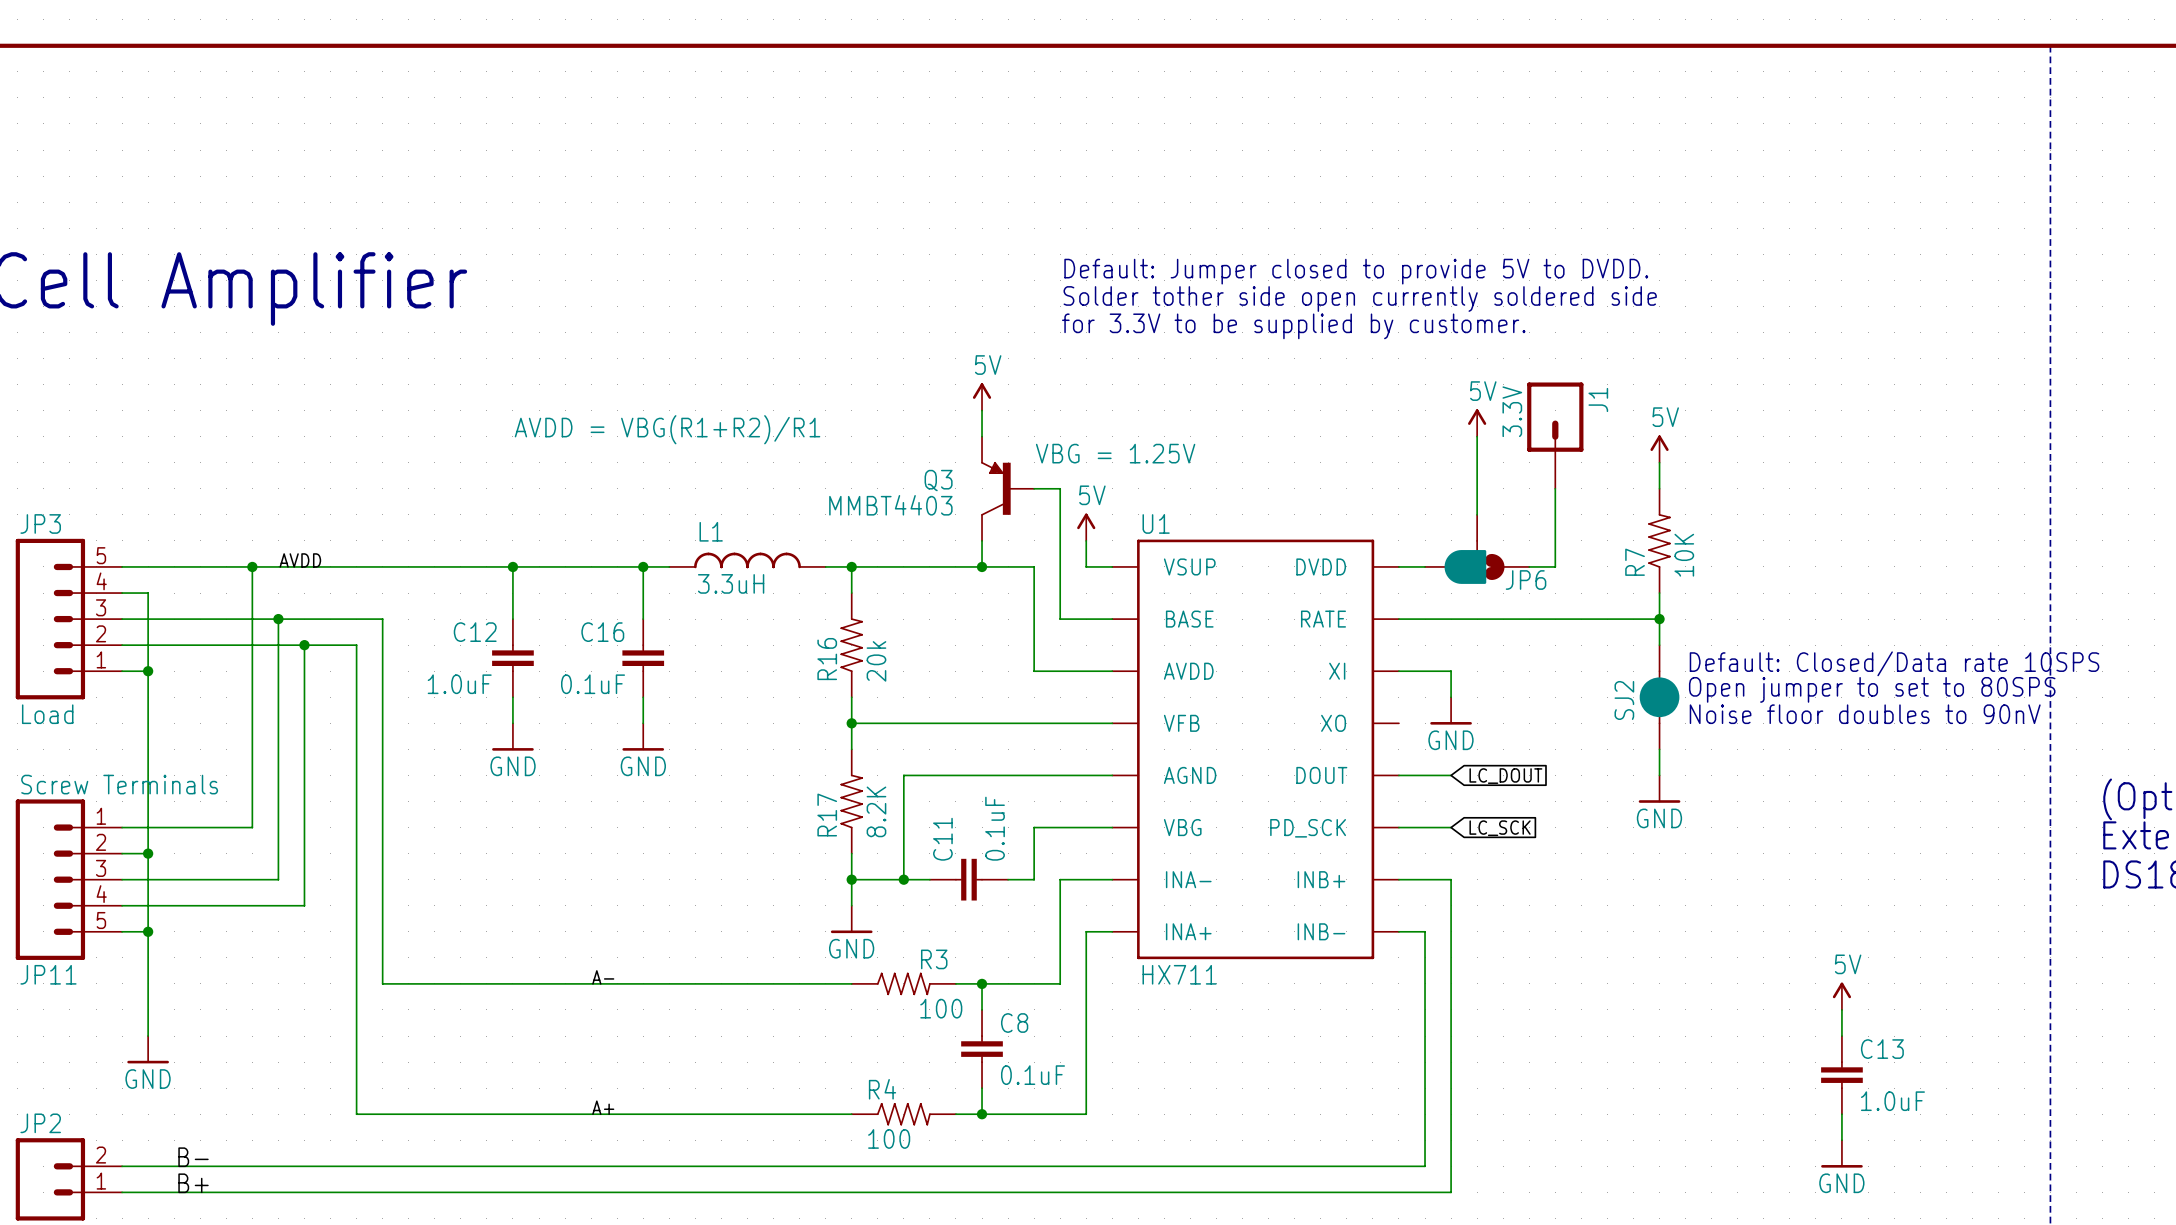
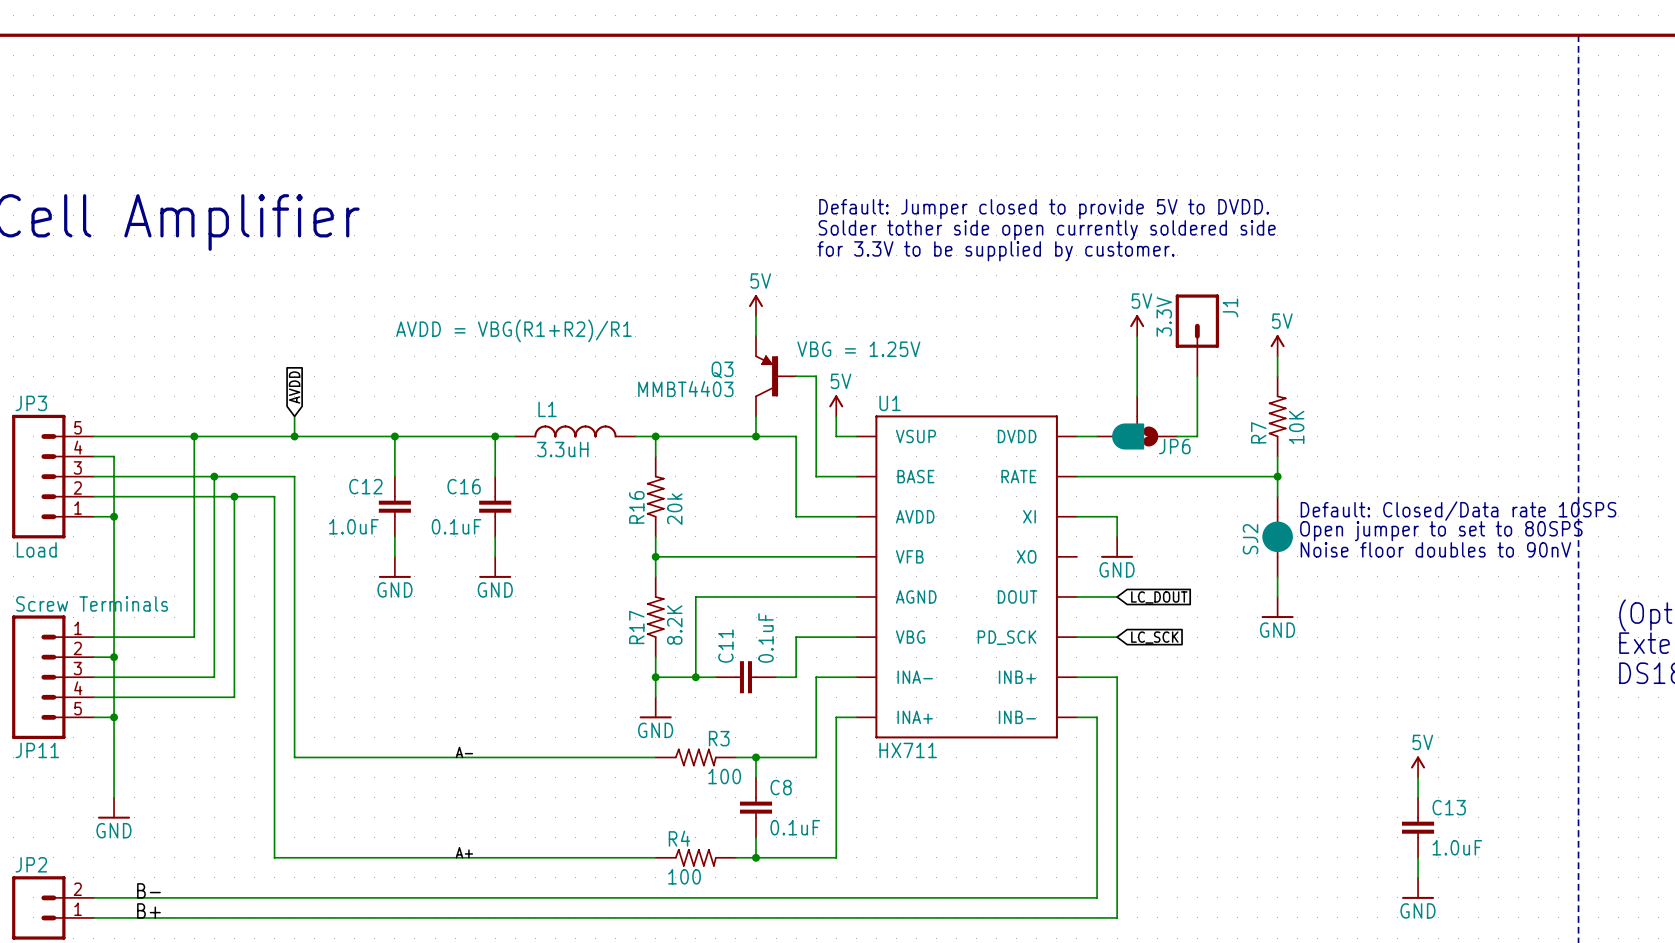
global label: none -> AVDD (294, 387)
wire: none -> (294, 416) (294, 436)
label: AVDD (300, 560) -> none
junction: none -> (294, 436)

